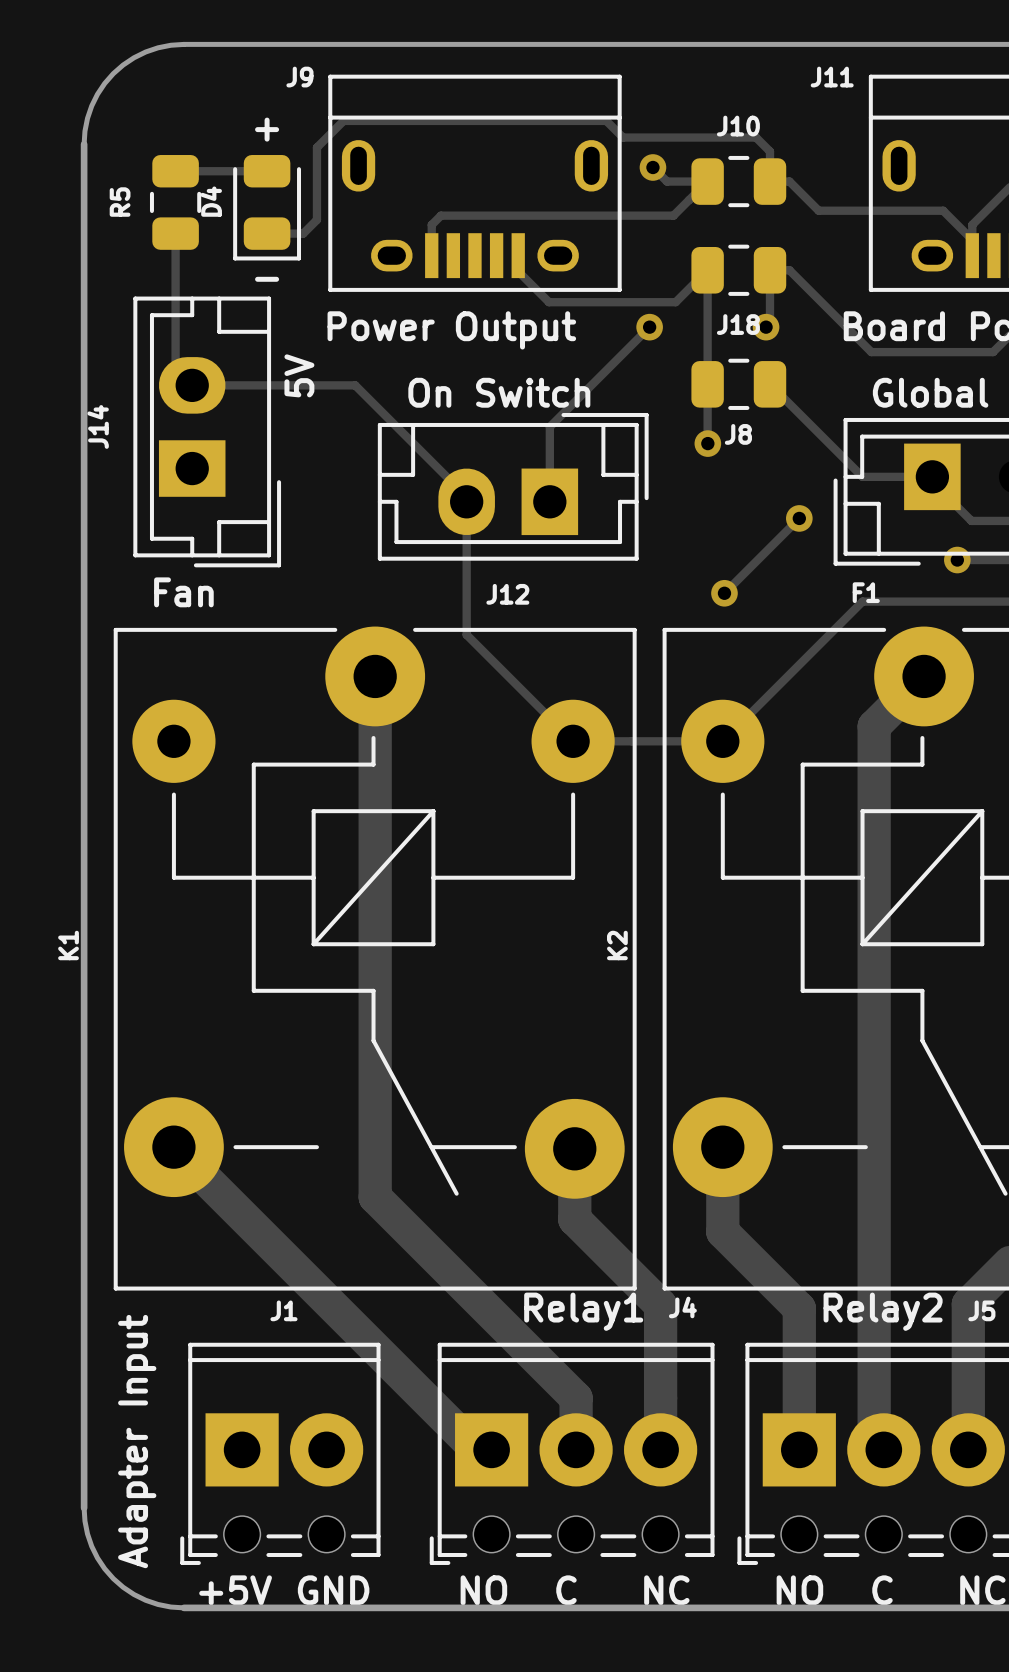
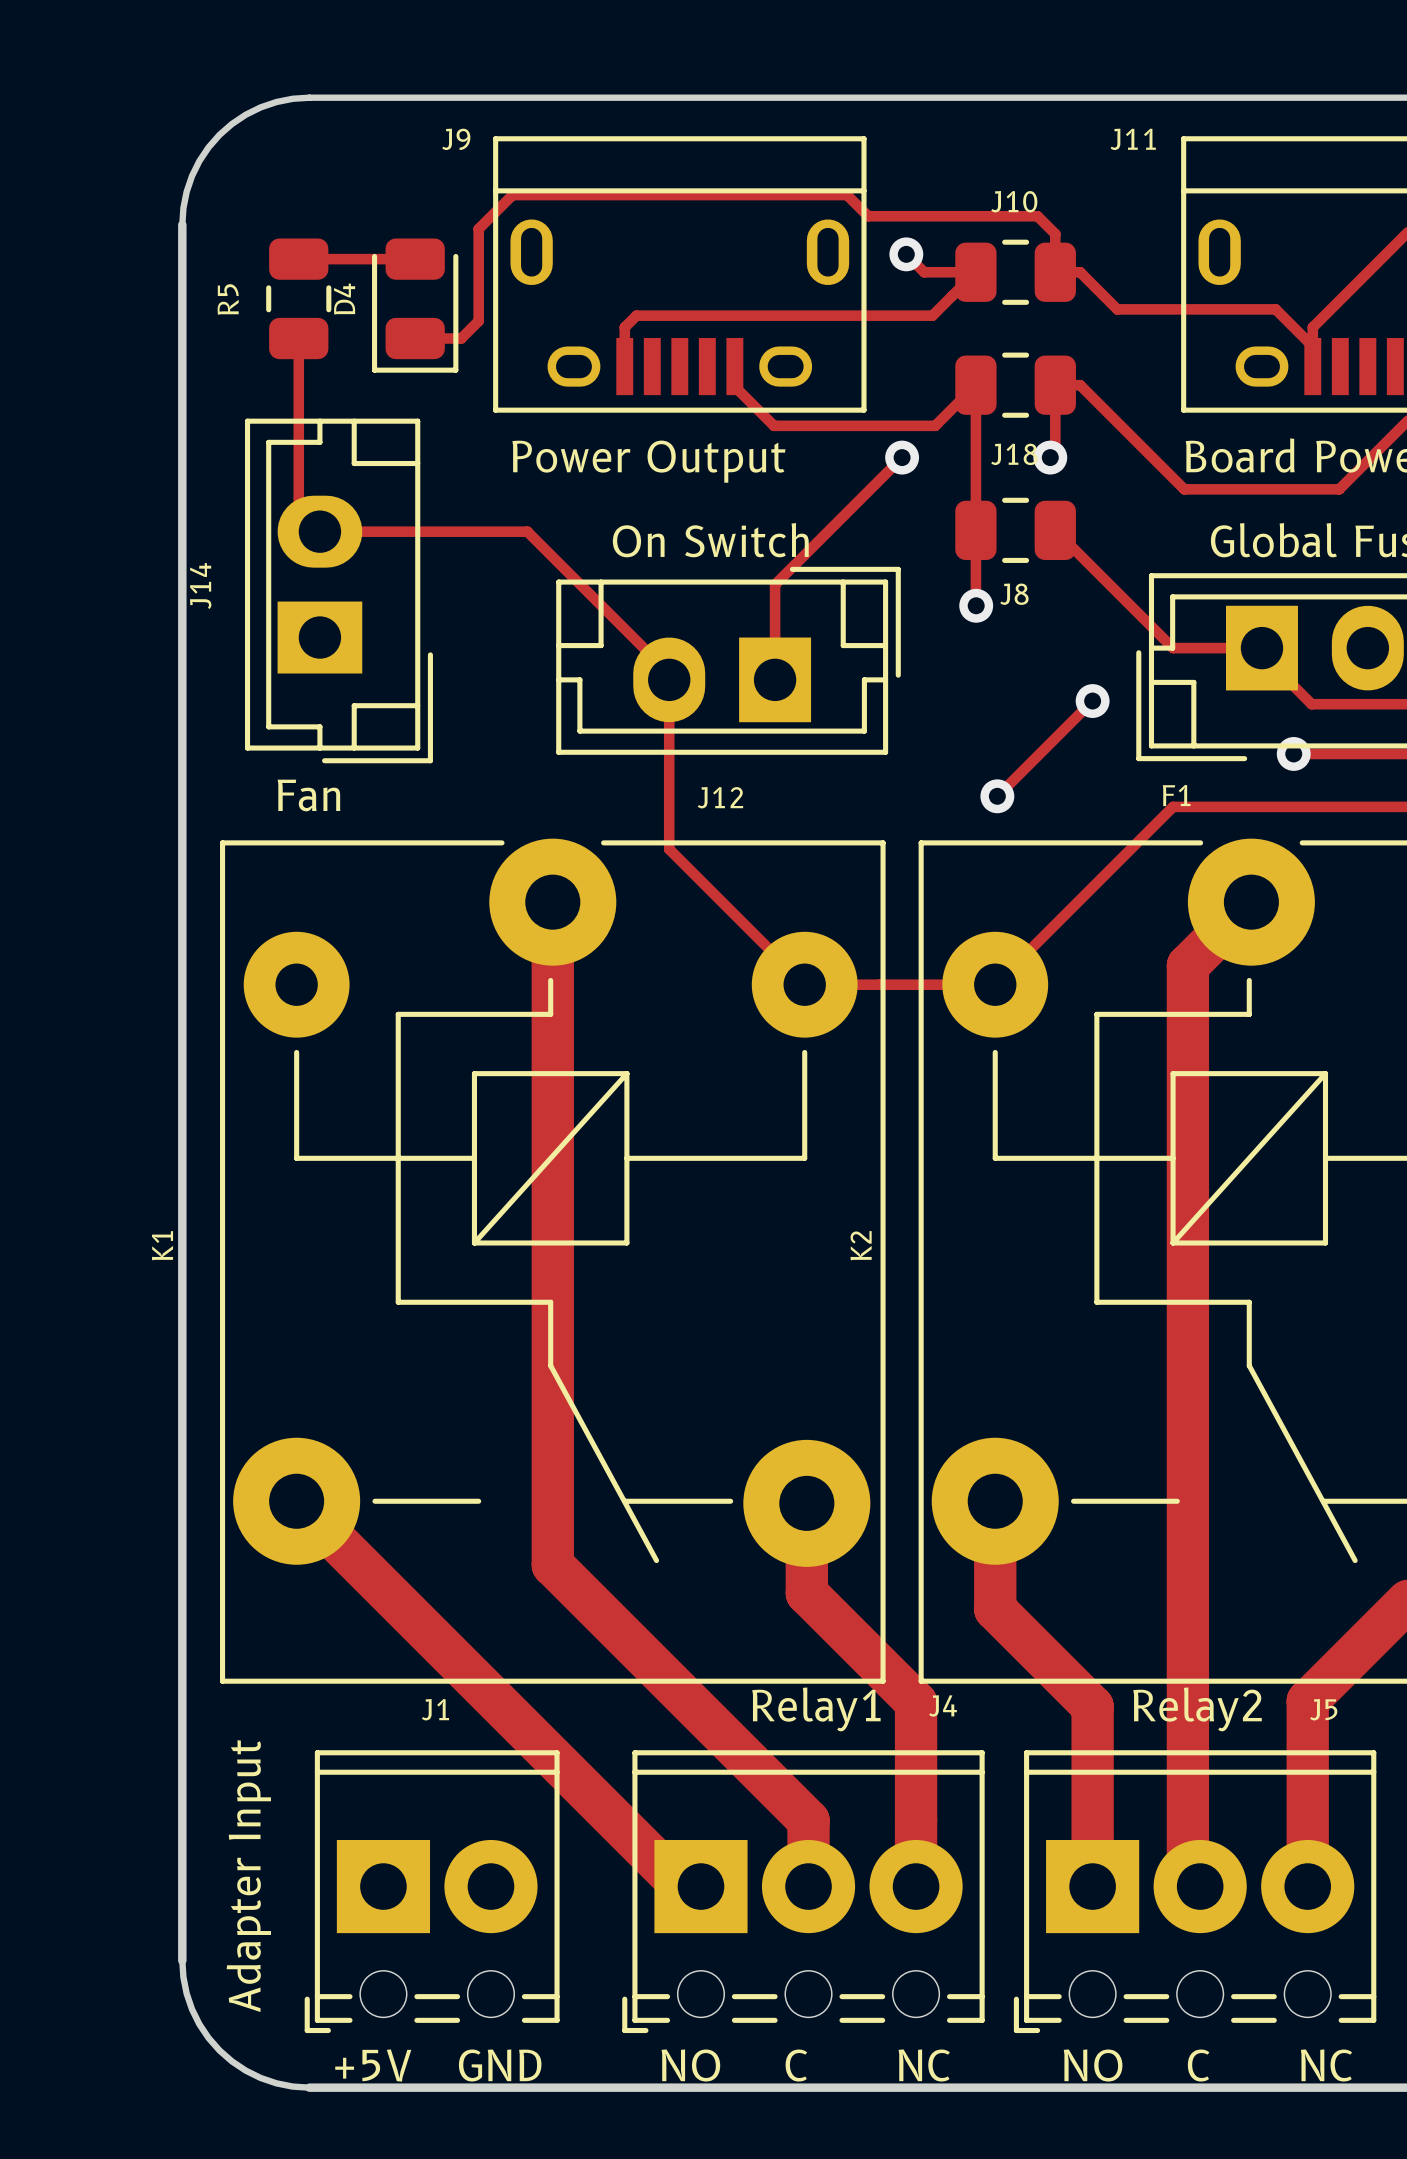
text: + (267, 129) -> none
text: - (267, 279) -> none
text: 5V (299, 375) -> none

